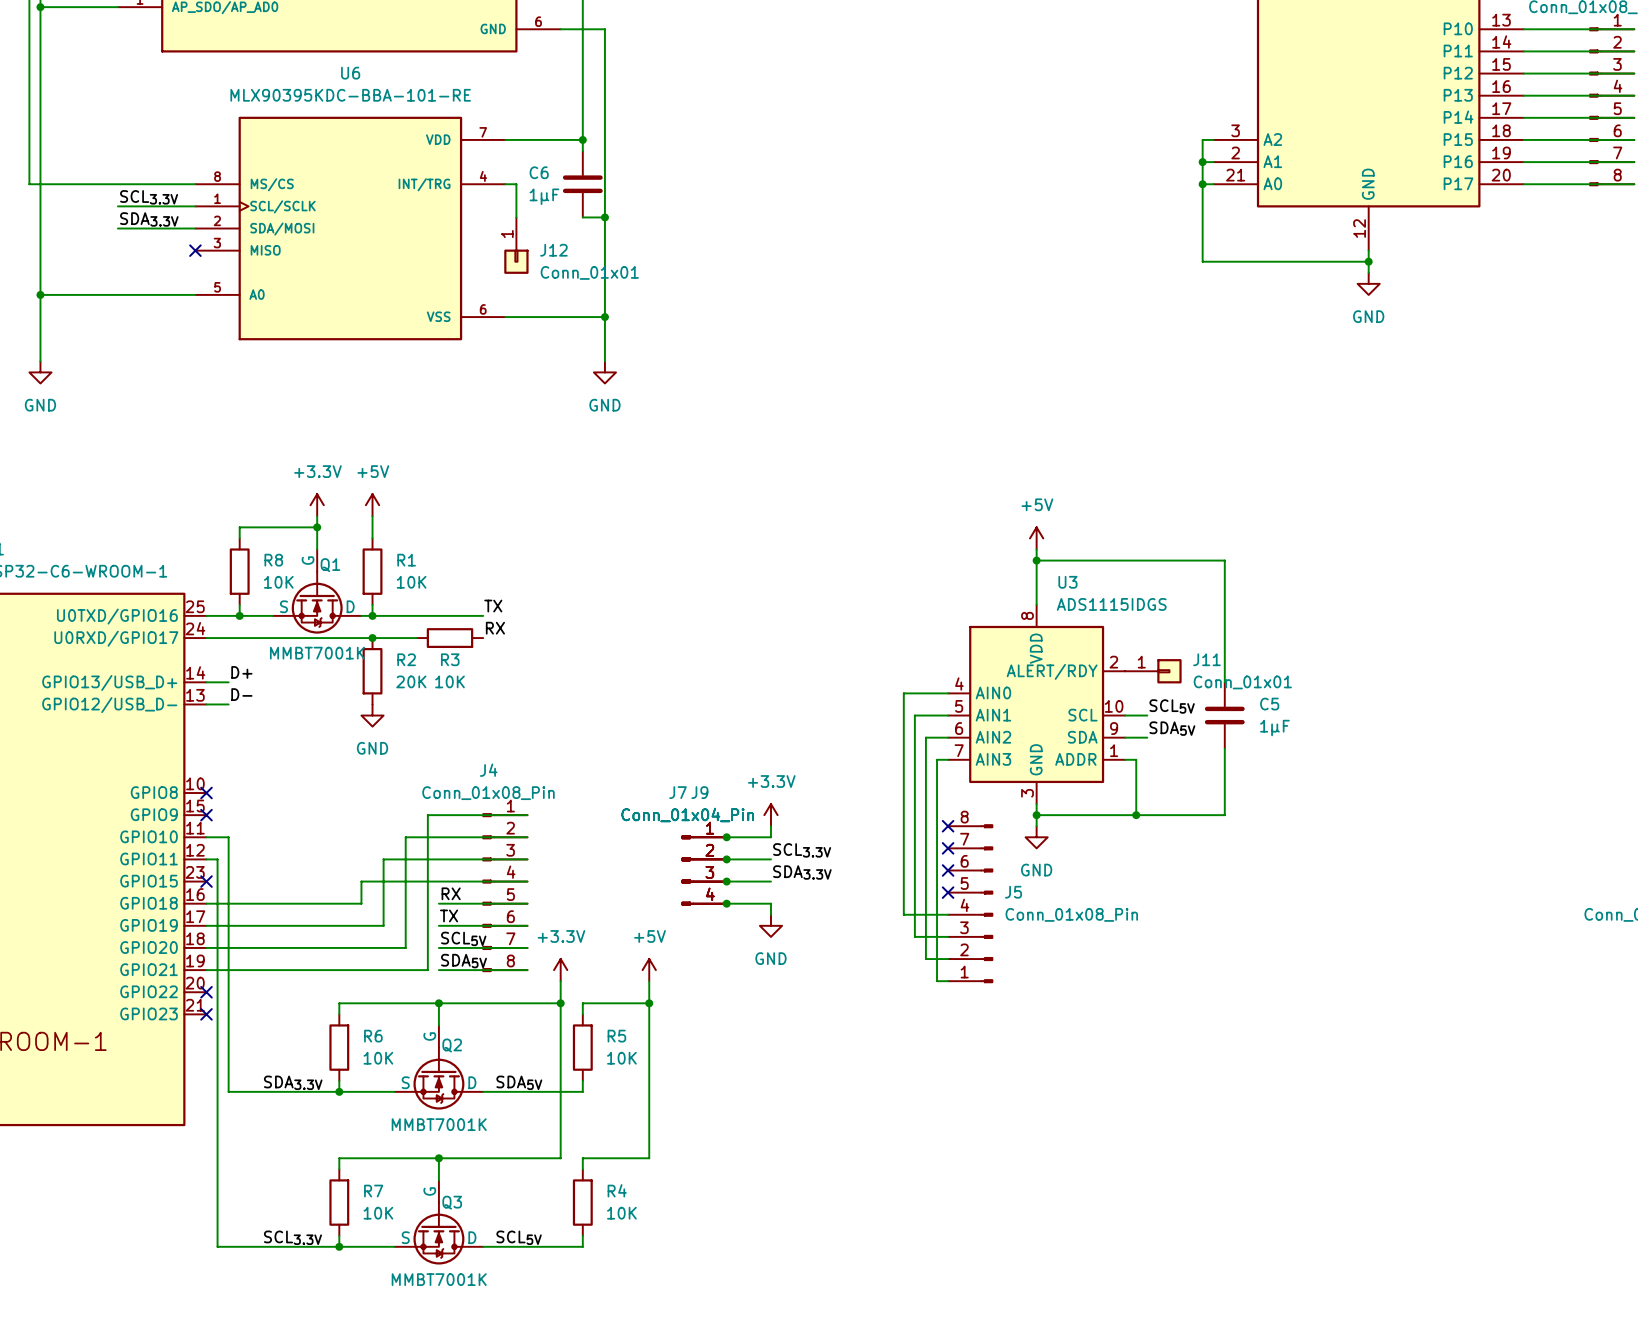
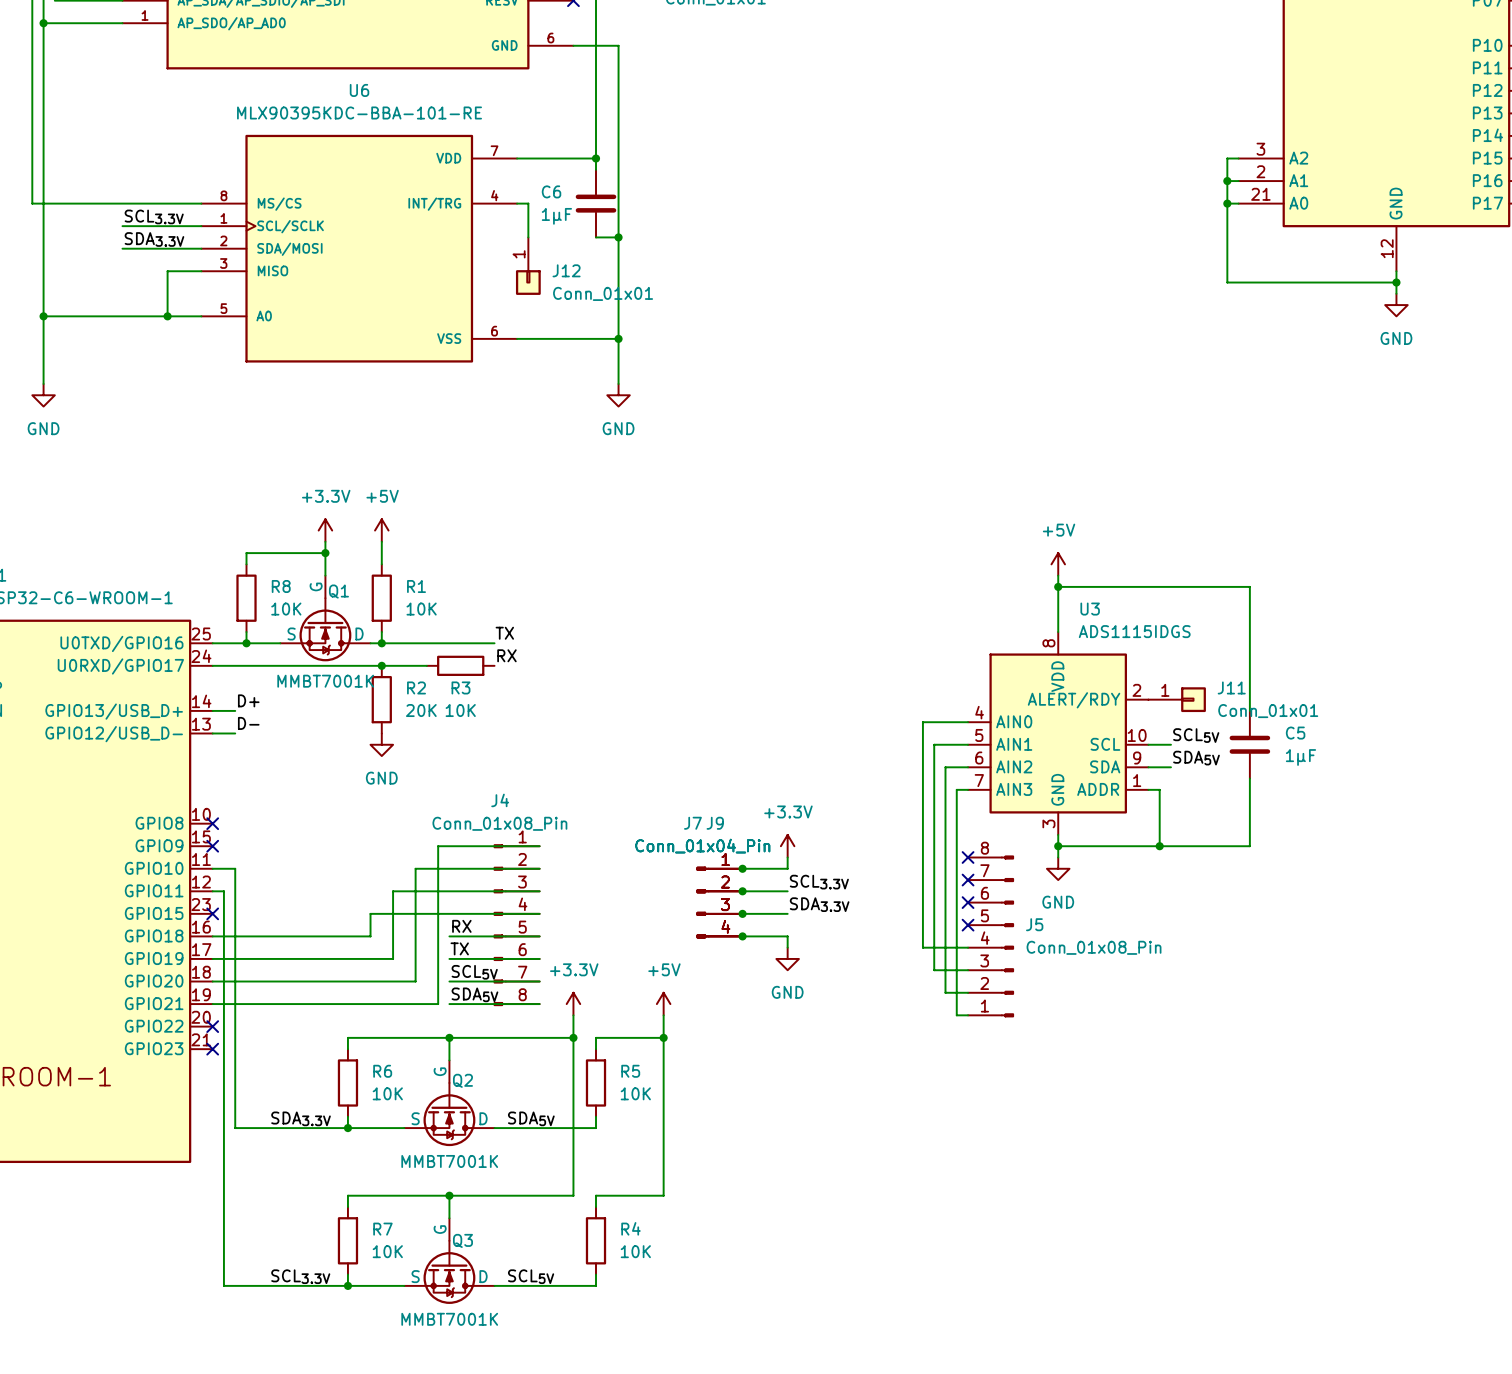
wire: none -> (201, 271) (167, 271) (167, 316)
no-connect mark: (195, 250) -> none
junction: none -> (167, 316)

